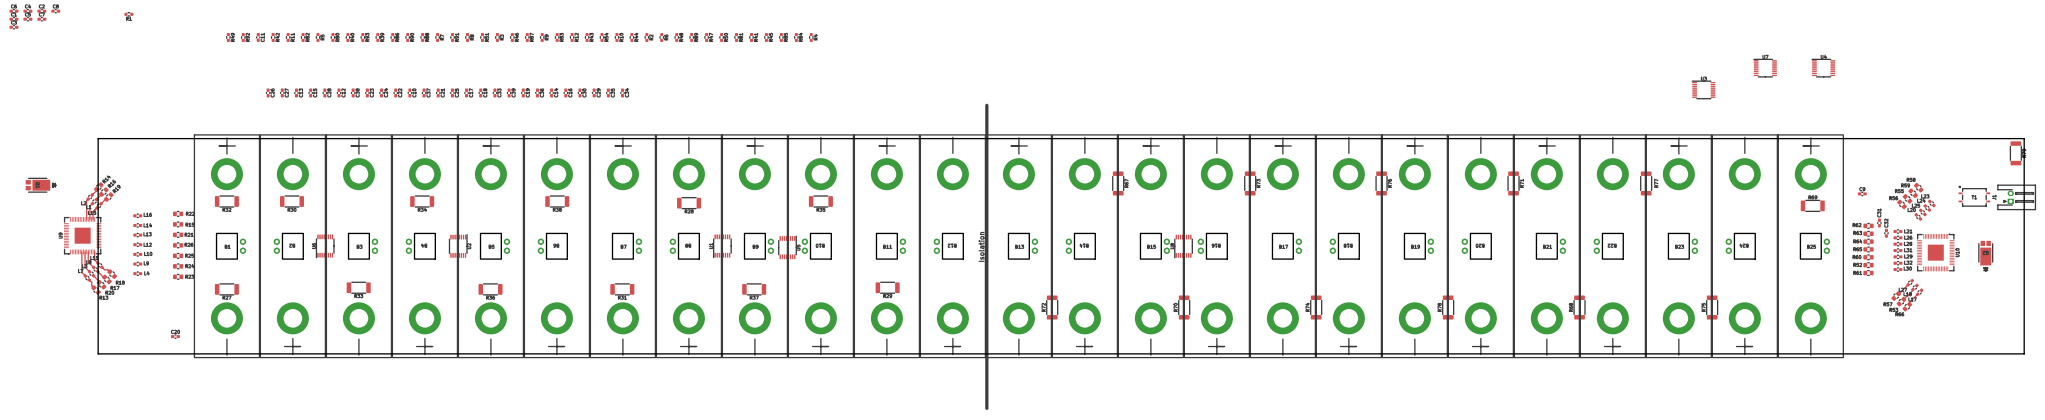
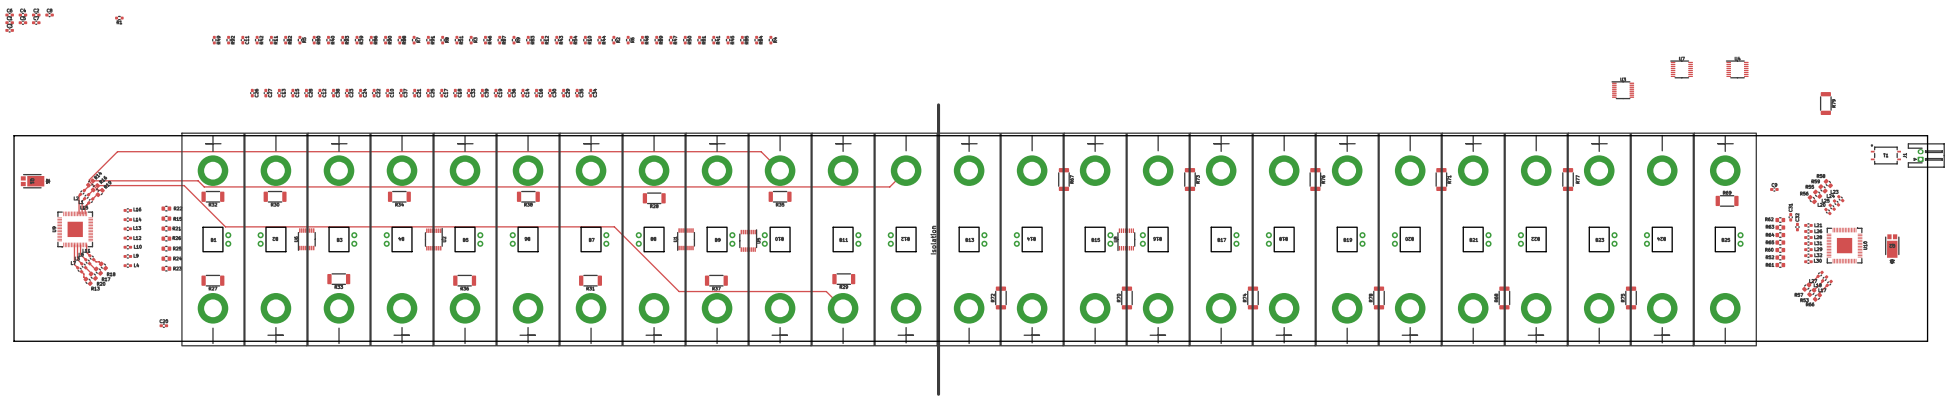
board edge: (98, 138) (2024, 138) (2024, 353) (98, 353) (98, 138) -> (14, 135) (14, 341) (1927, 341) (1927, 135) (14, 135)
part position: (2015, 153) -> (1825, 103)
top track: none -> (780, 170) (761, 151) (117, 151) (89, 179) (98, 190) (102, 190)
top track: none -> (906, 170) (889, 186) (204, 186) (198, 180) (92, 180)
top track: none -> (97, 185) (184, 185) (225, 226) (614, 226) (679, 291) (826, 291) (843, 308)
part position: (1974, 197) -> (1885, 155)
part position: (2016, 197) -> (1926, 155)

